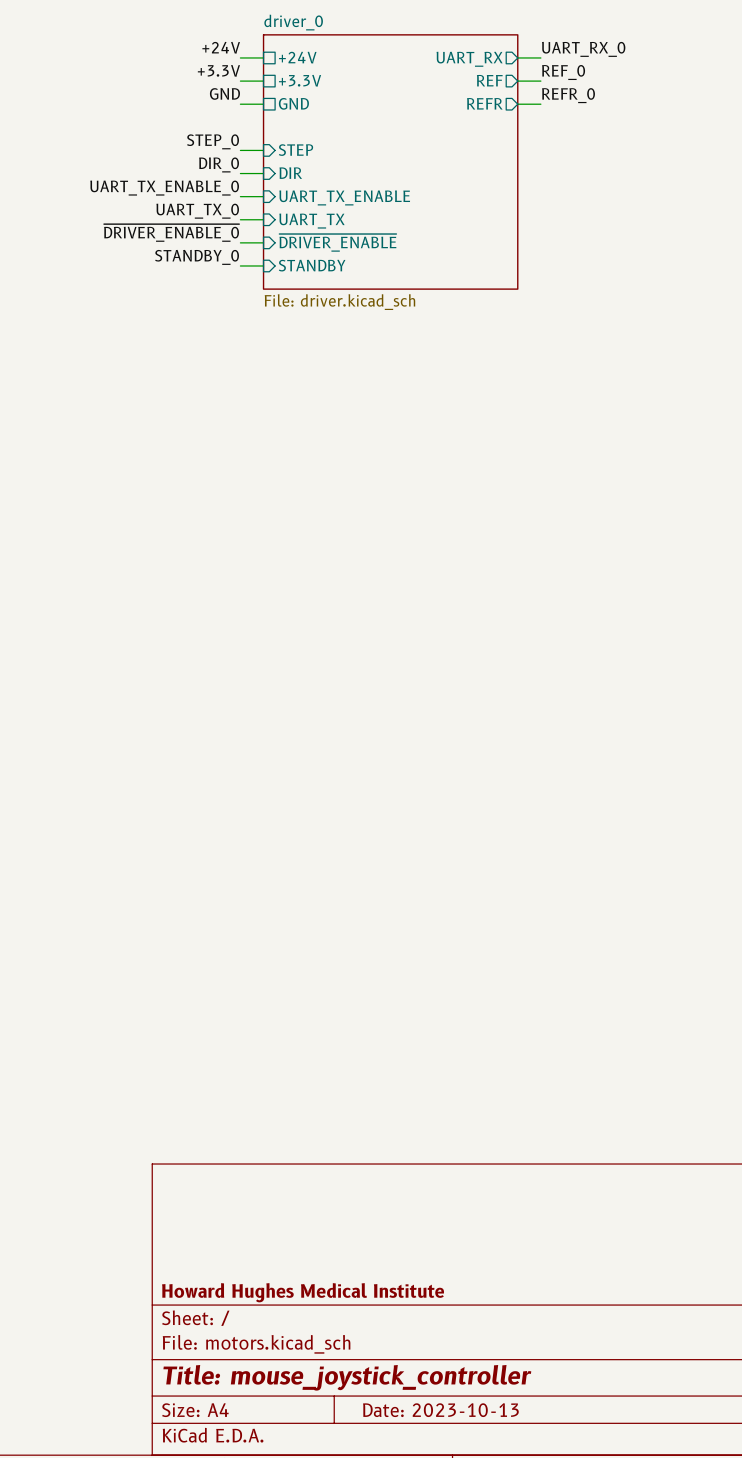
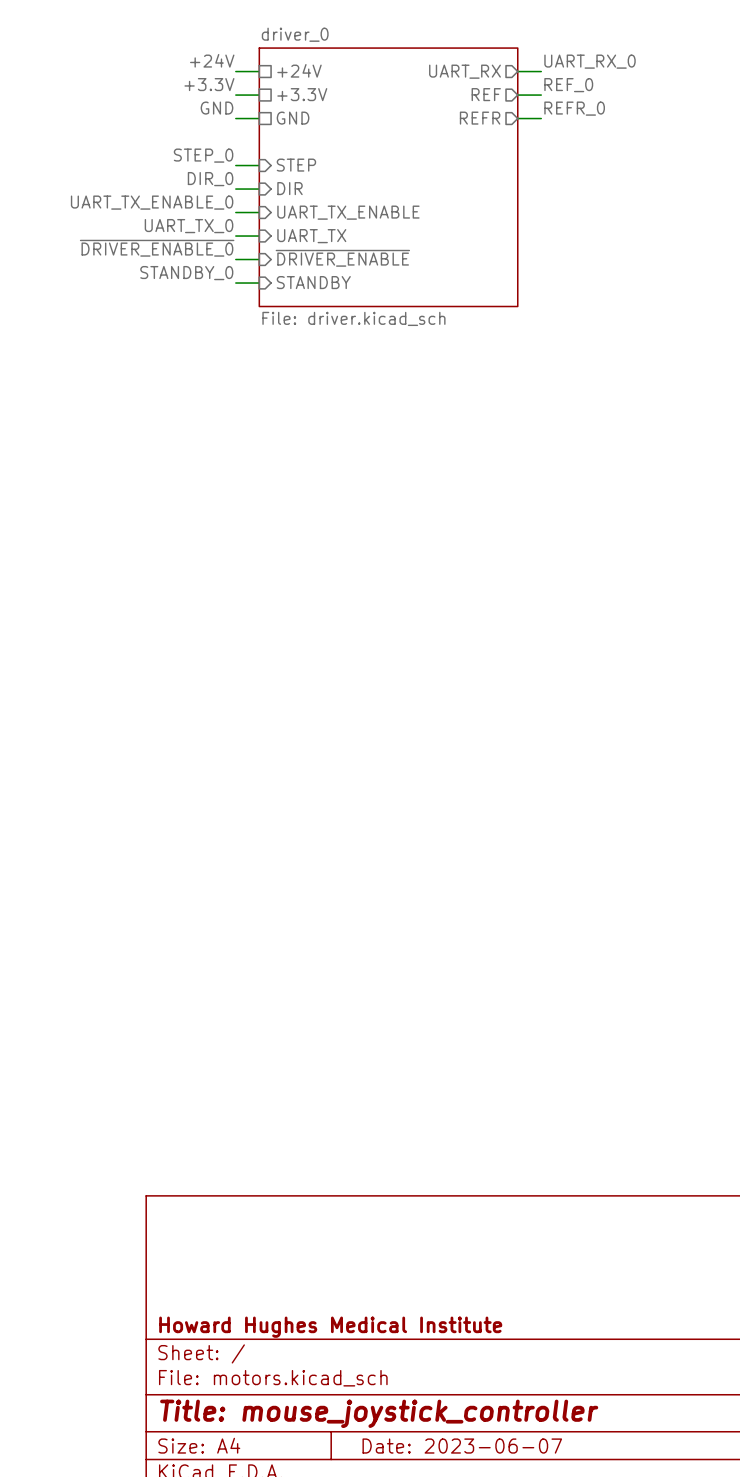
title block: Date: 2023-10-13 (440, 1410) -> Date: 2023-06-07 (462, 1446)

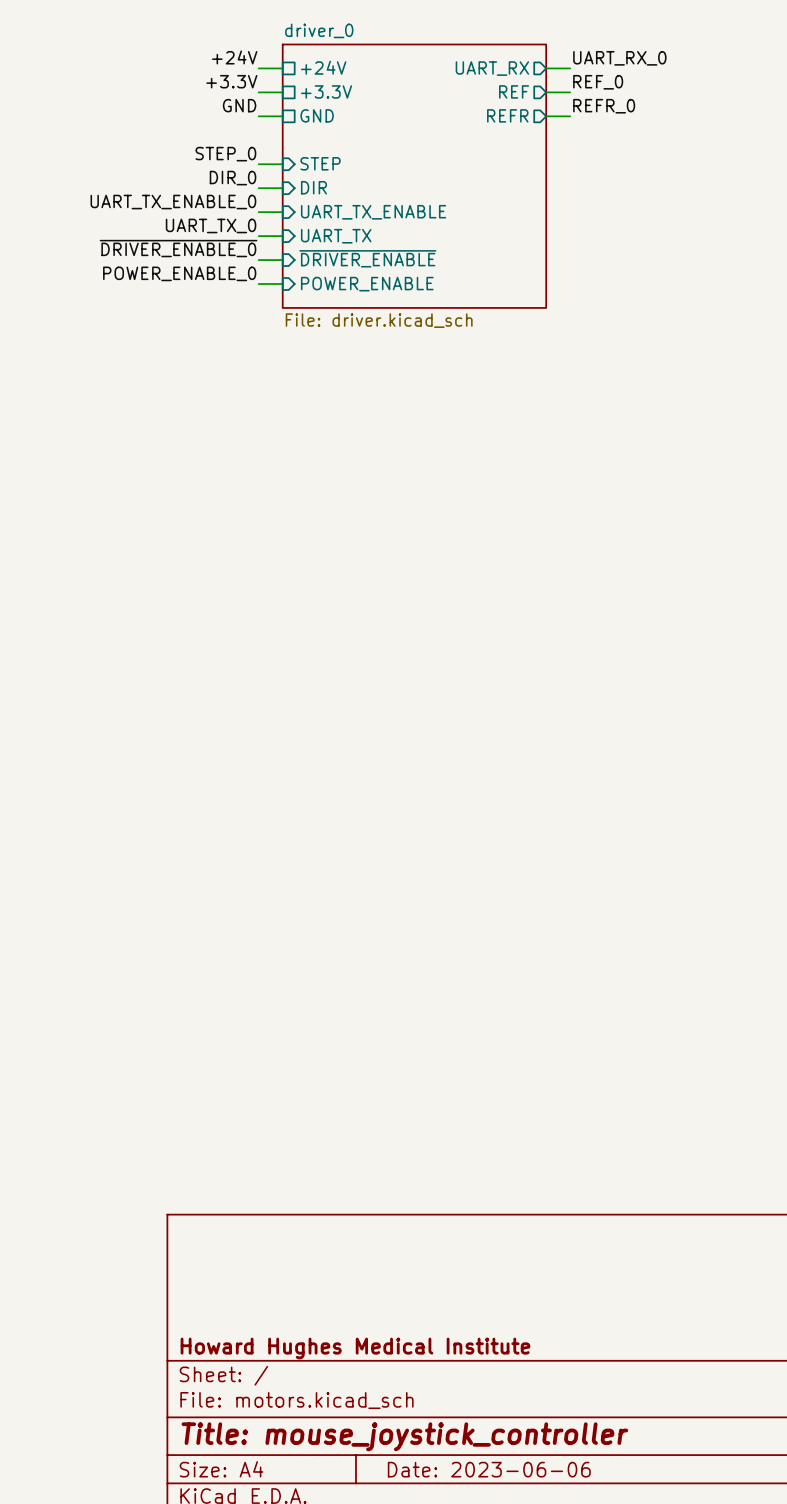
label: STANDBY_0 (186, 273) -> POWER_ENABLE_0 (179, 273)
sheet pin: STANDBY (313, 282) -> POWER_ENABLE (367, 284)
title block: Date: 2023-06-07 (462, 1446) -> Date: 2023-06-06 (489, 1469)

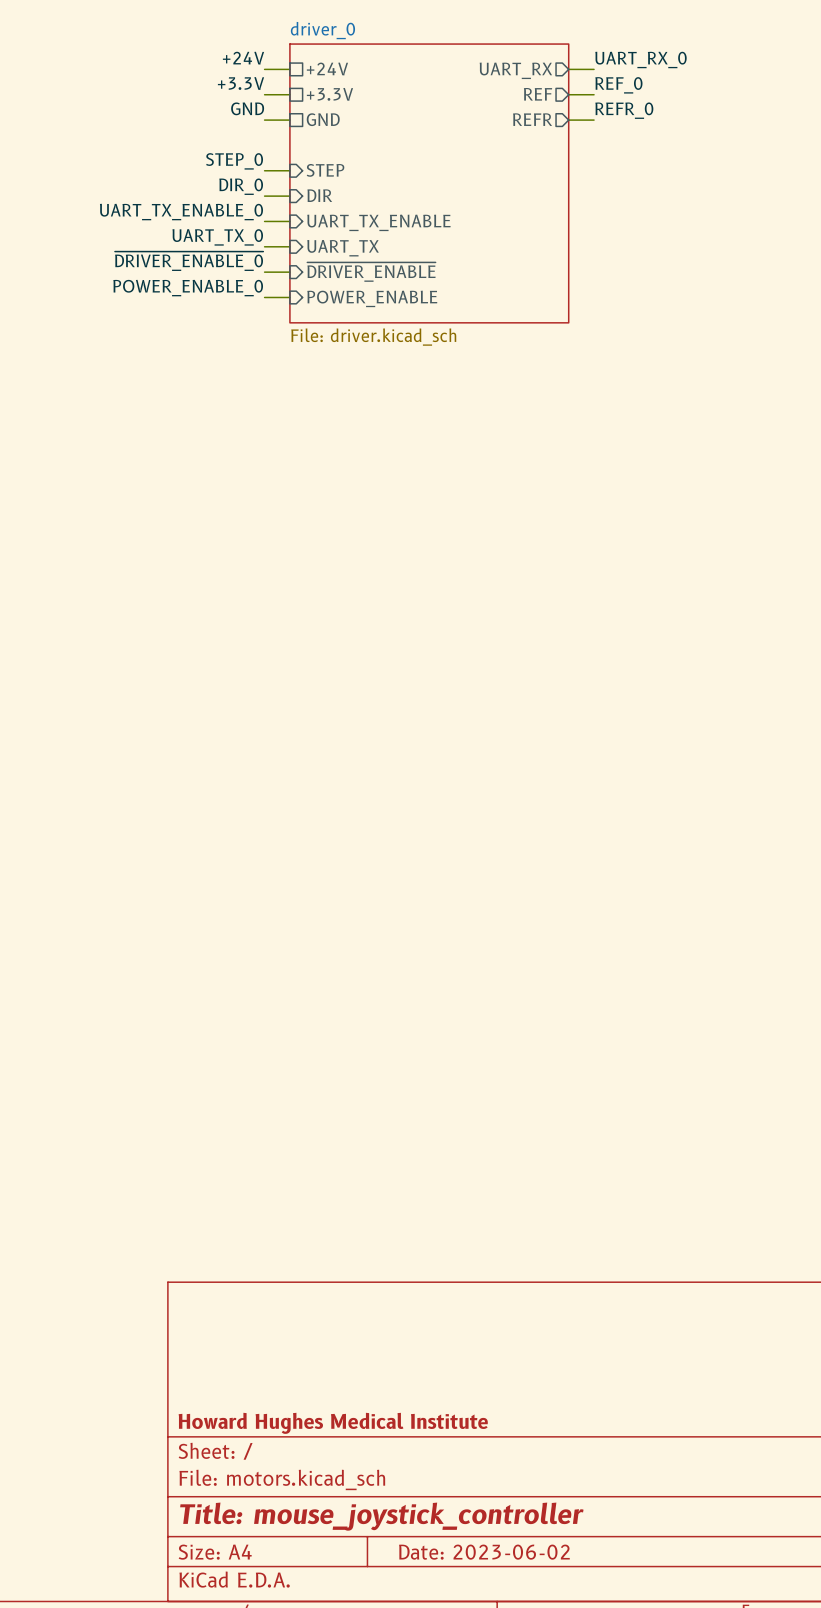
title block: Date: 2023-06-06 (489, 1469) -> Date: 2023-06-02 (484, 1552)

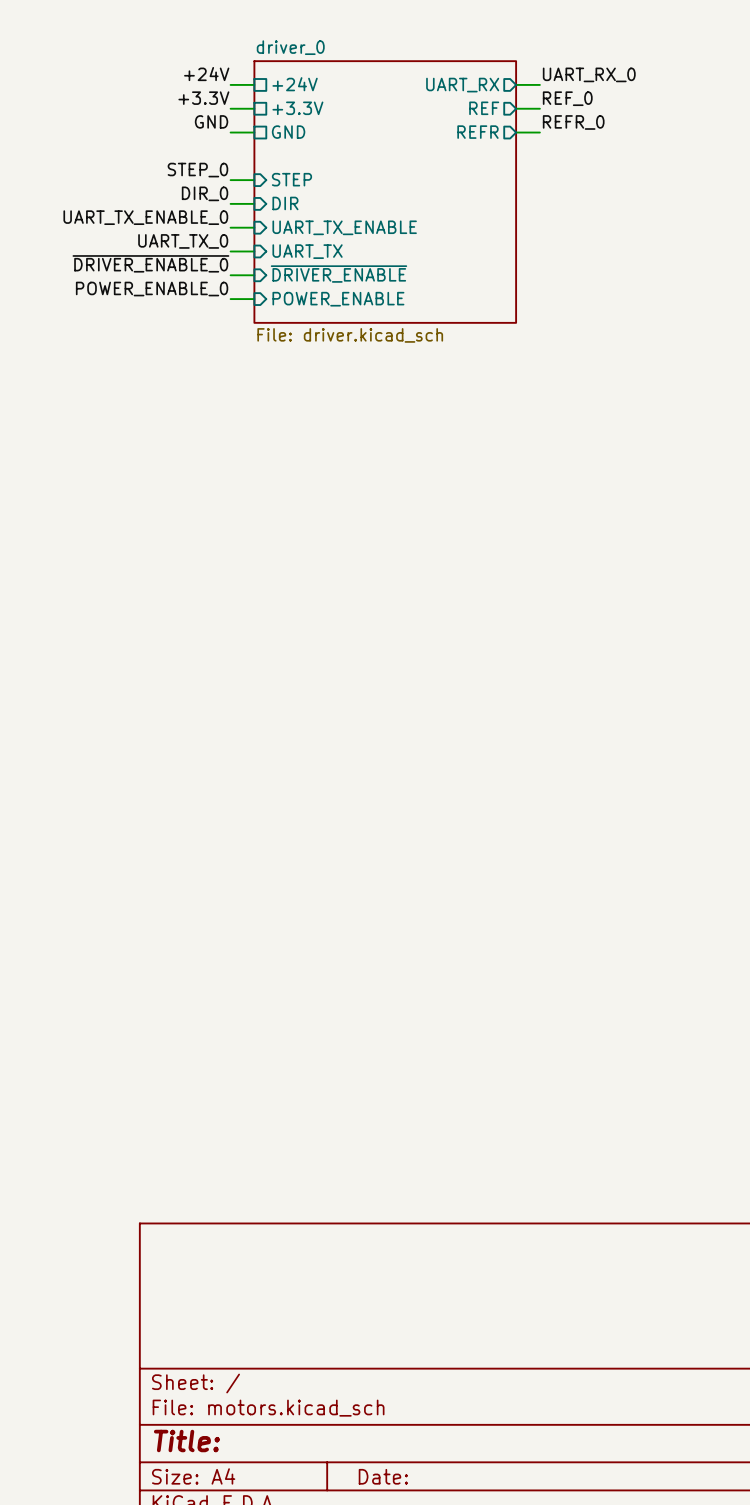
title block: Howard Hughes Medical Institute (333, 1423) -> none
title block: Title: mouse_joystick_controller (381, 1516) -> Title: (186, 1441)
title block: Date: 2023-06-02 (484, 1552) -> Date: (383, 1476)

